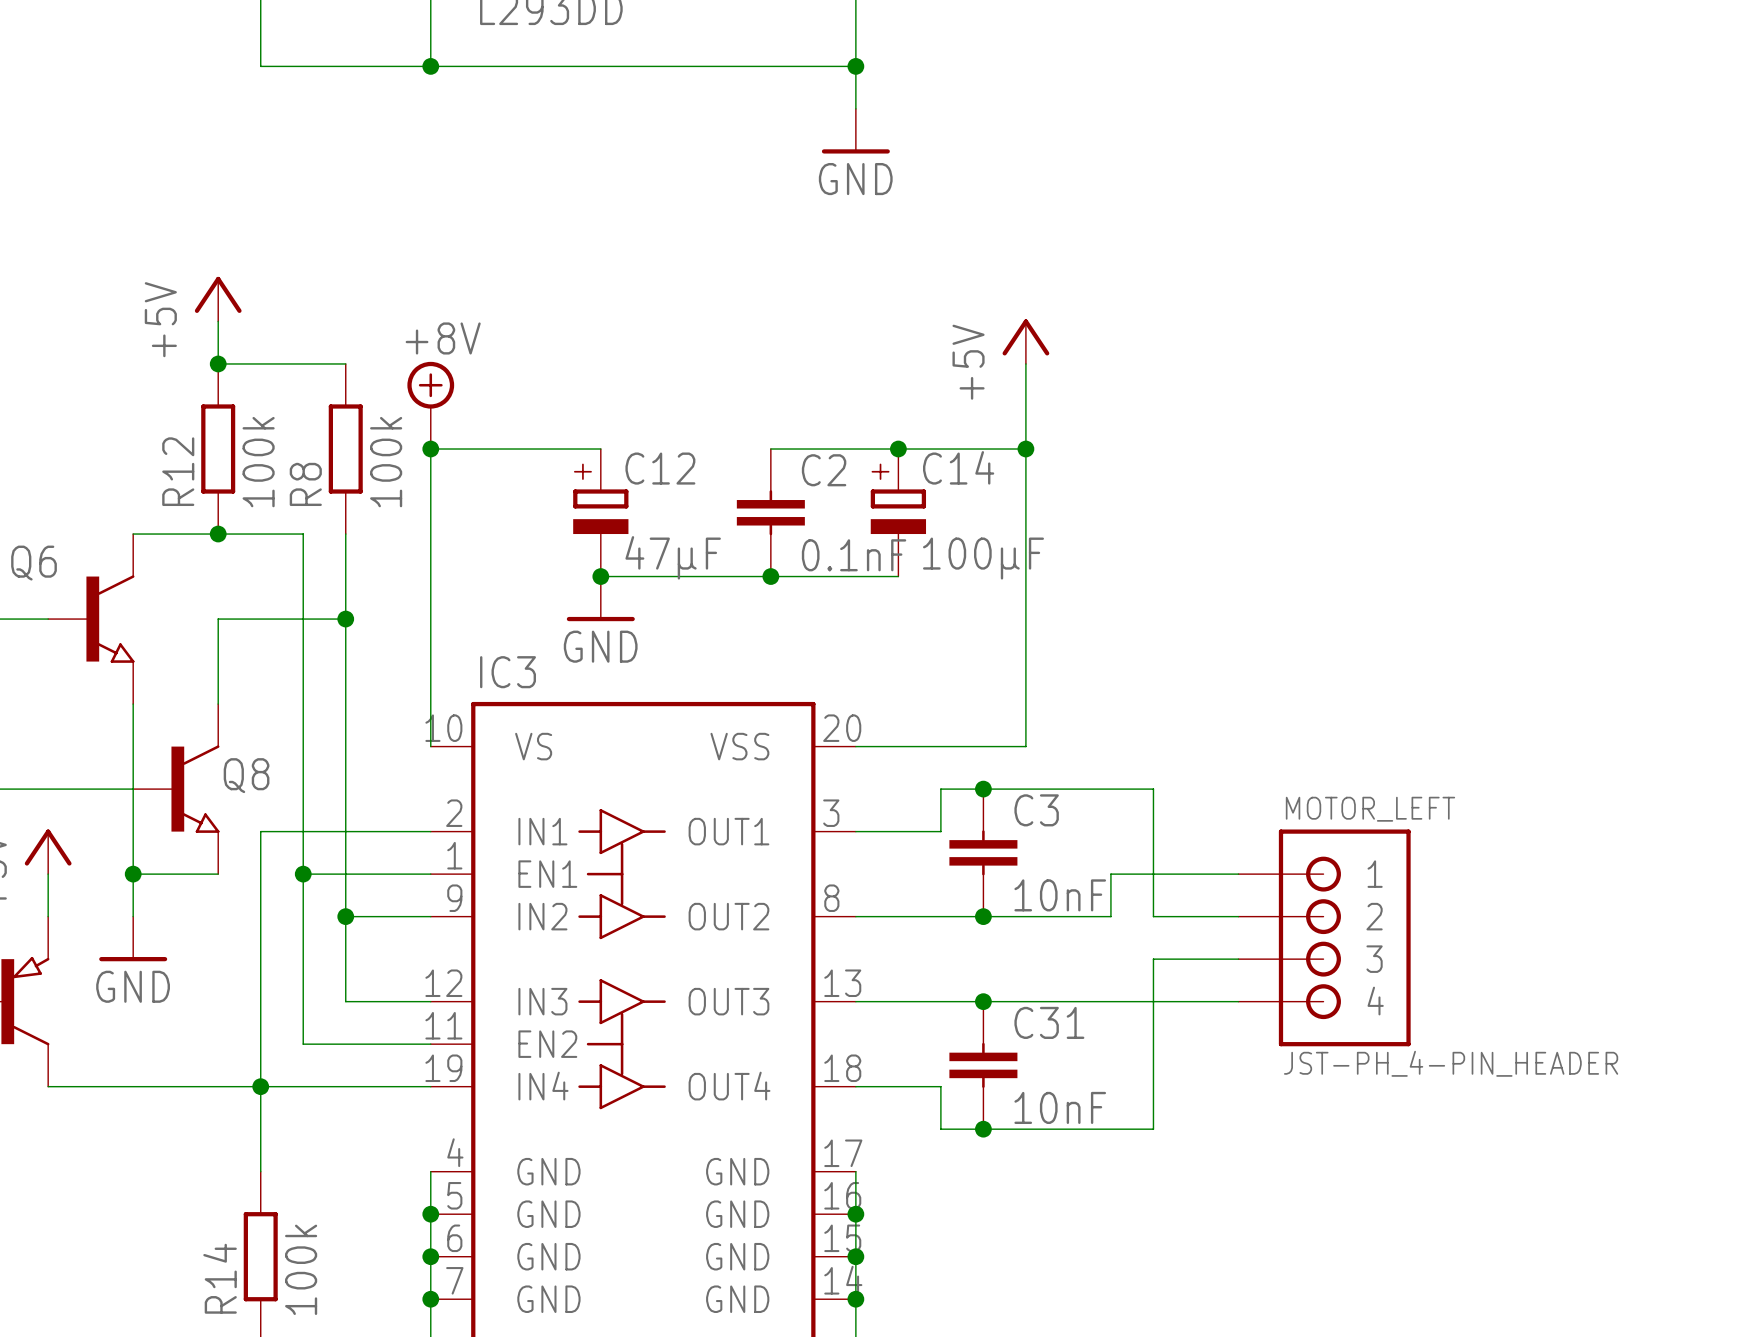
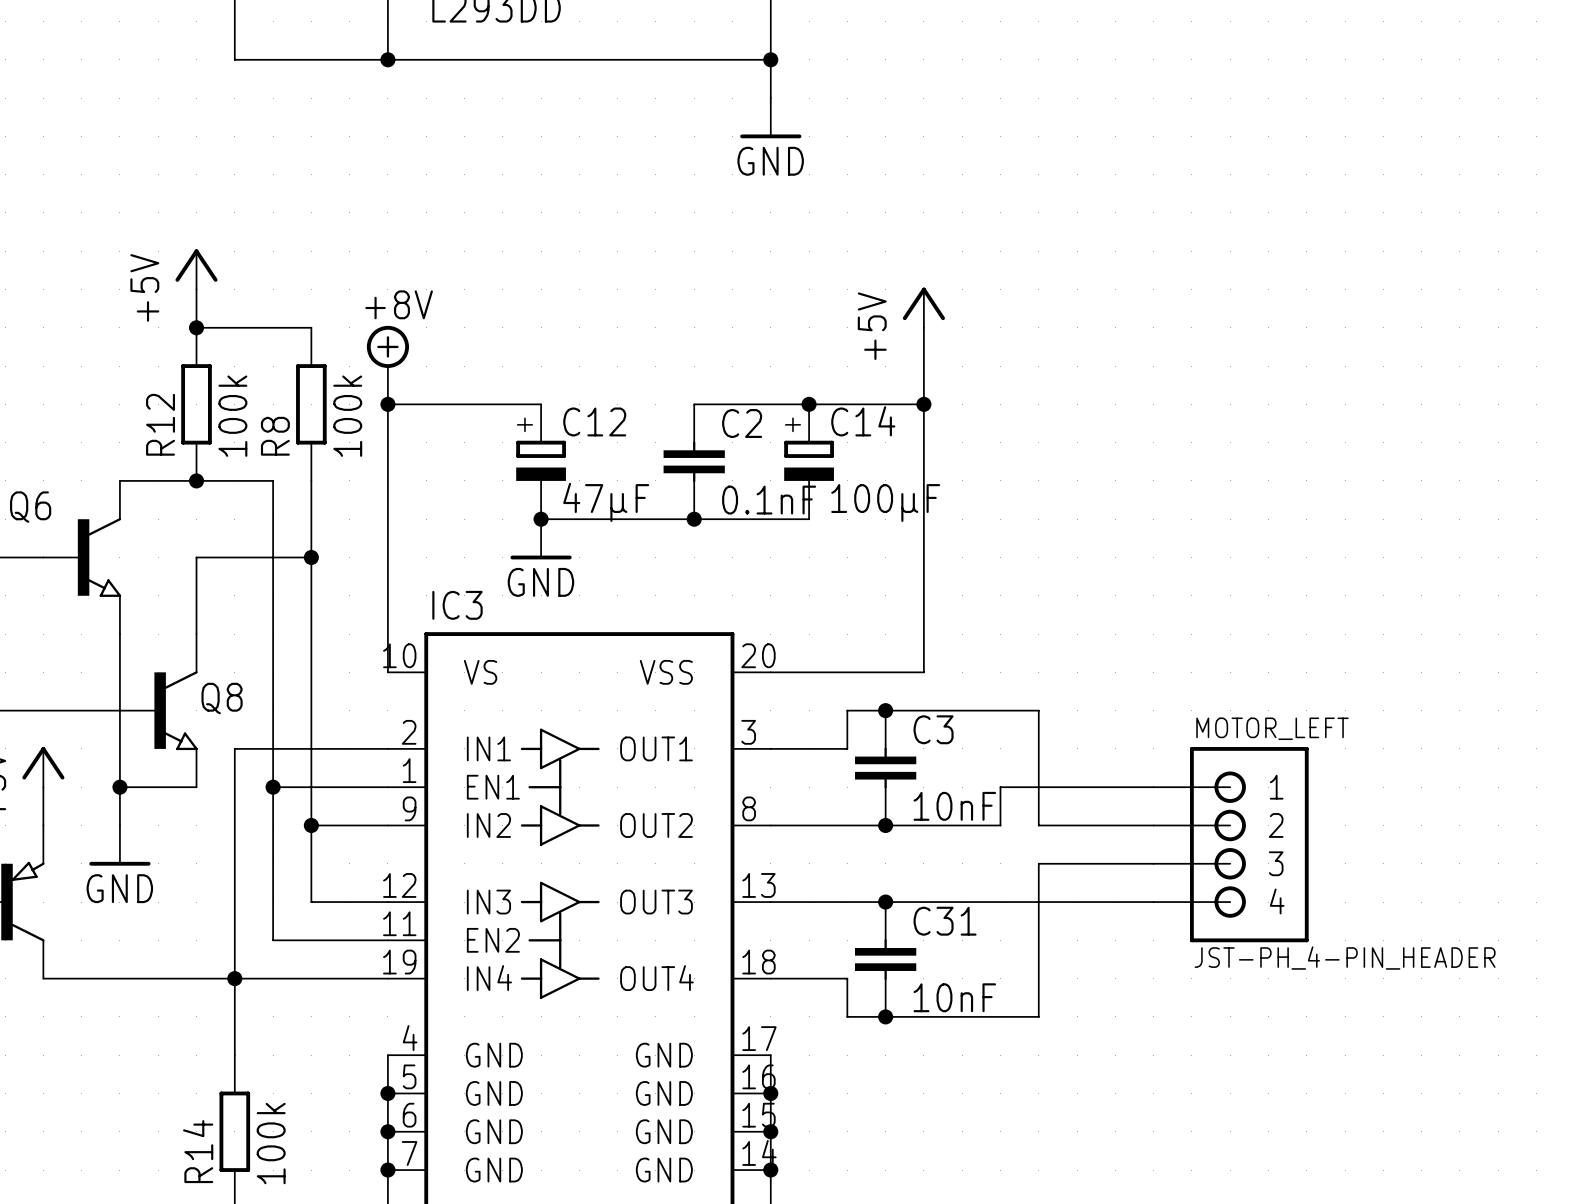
MOTOR_LEFT position: (1324, 937) -> (1231, 844)

